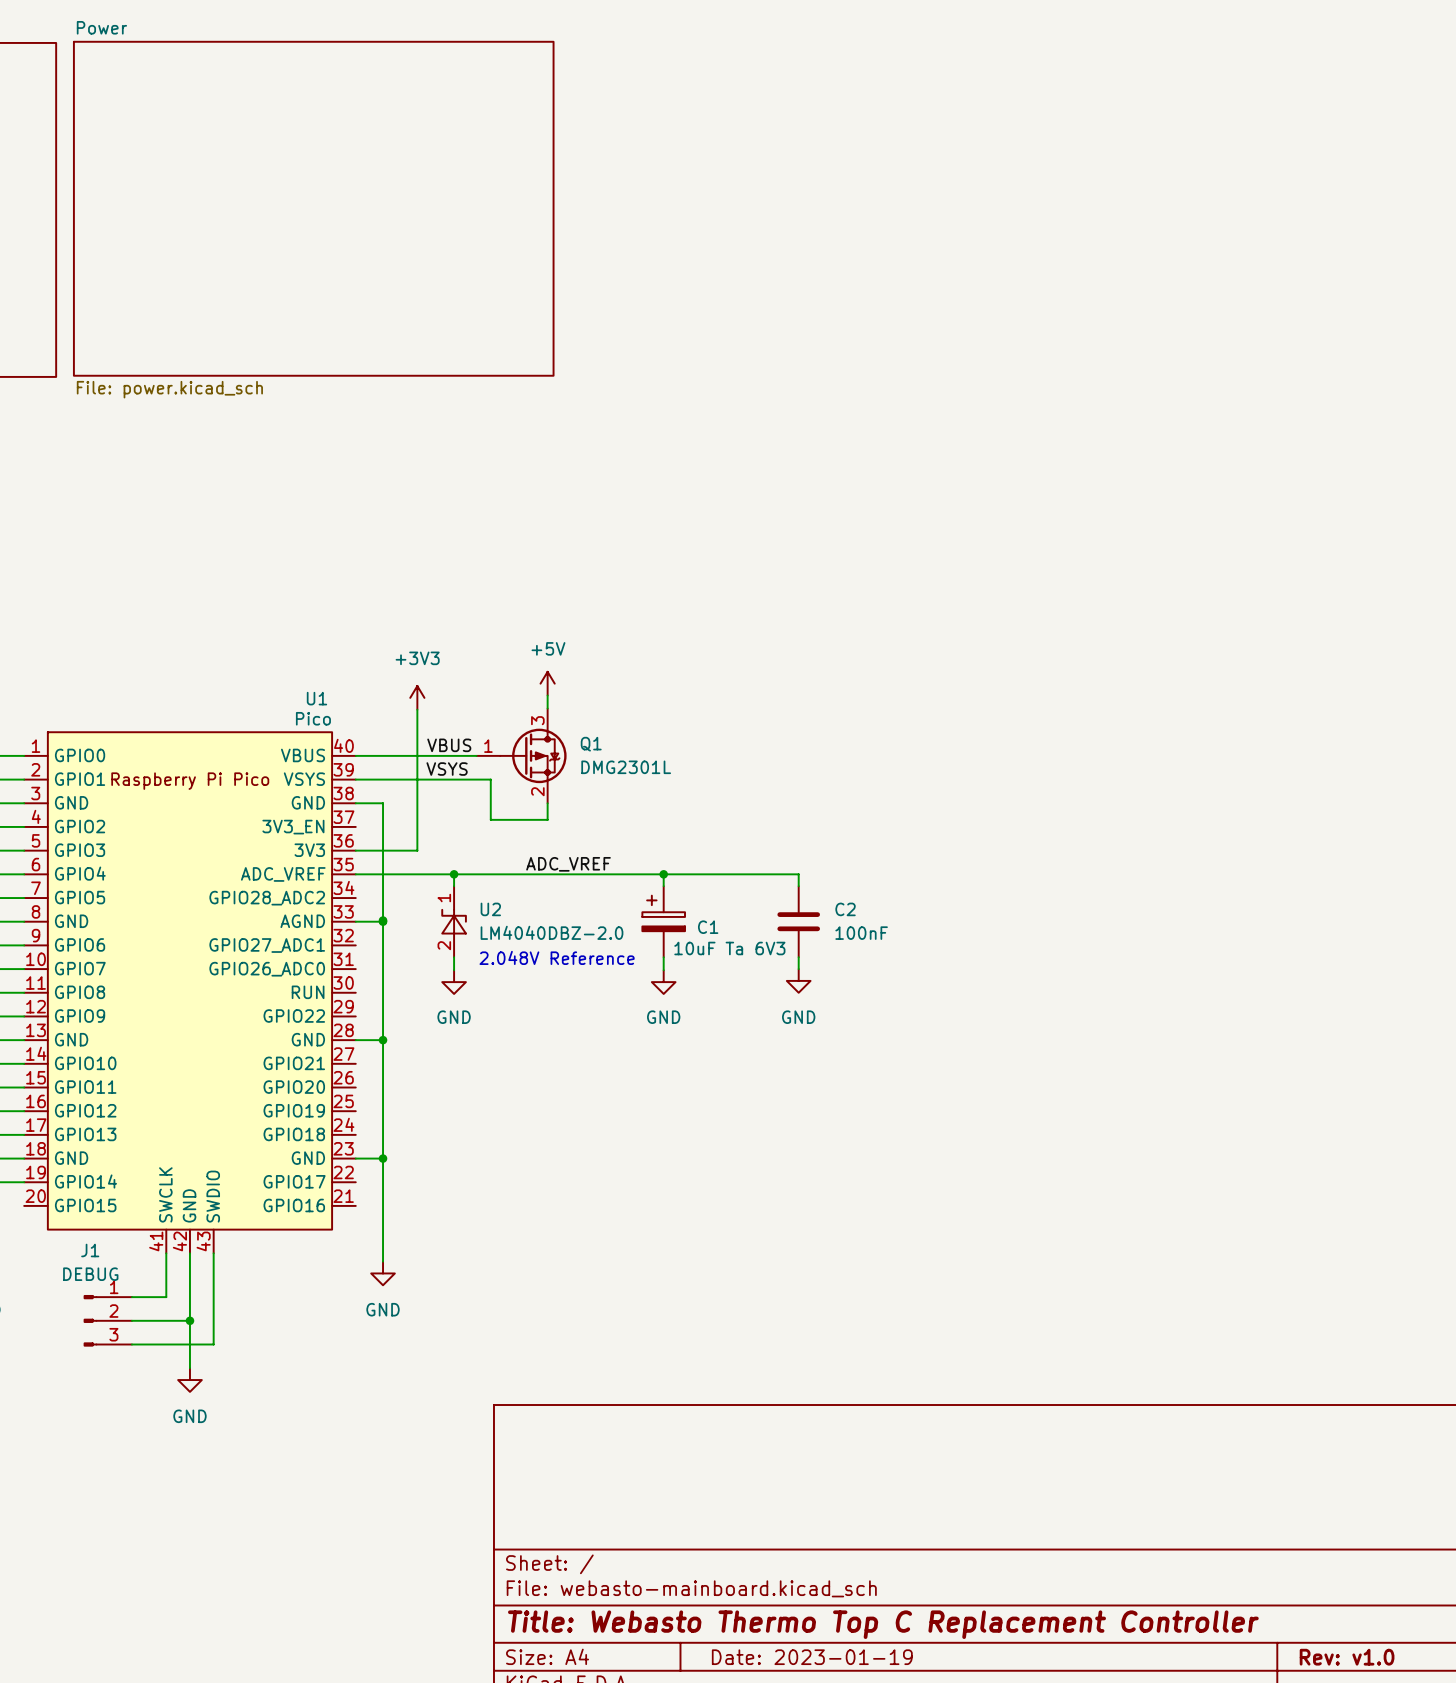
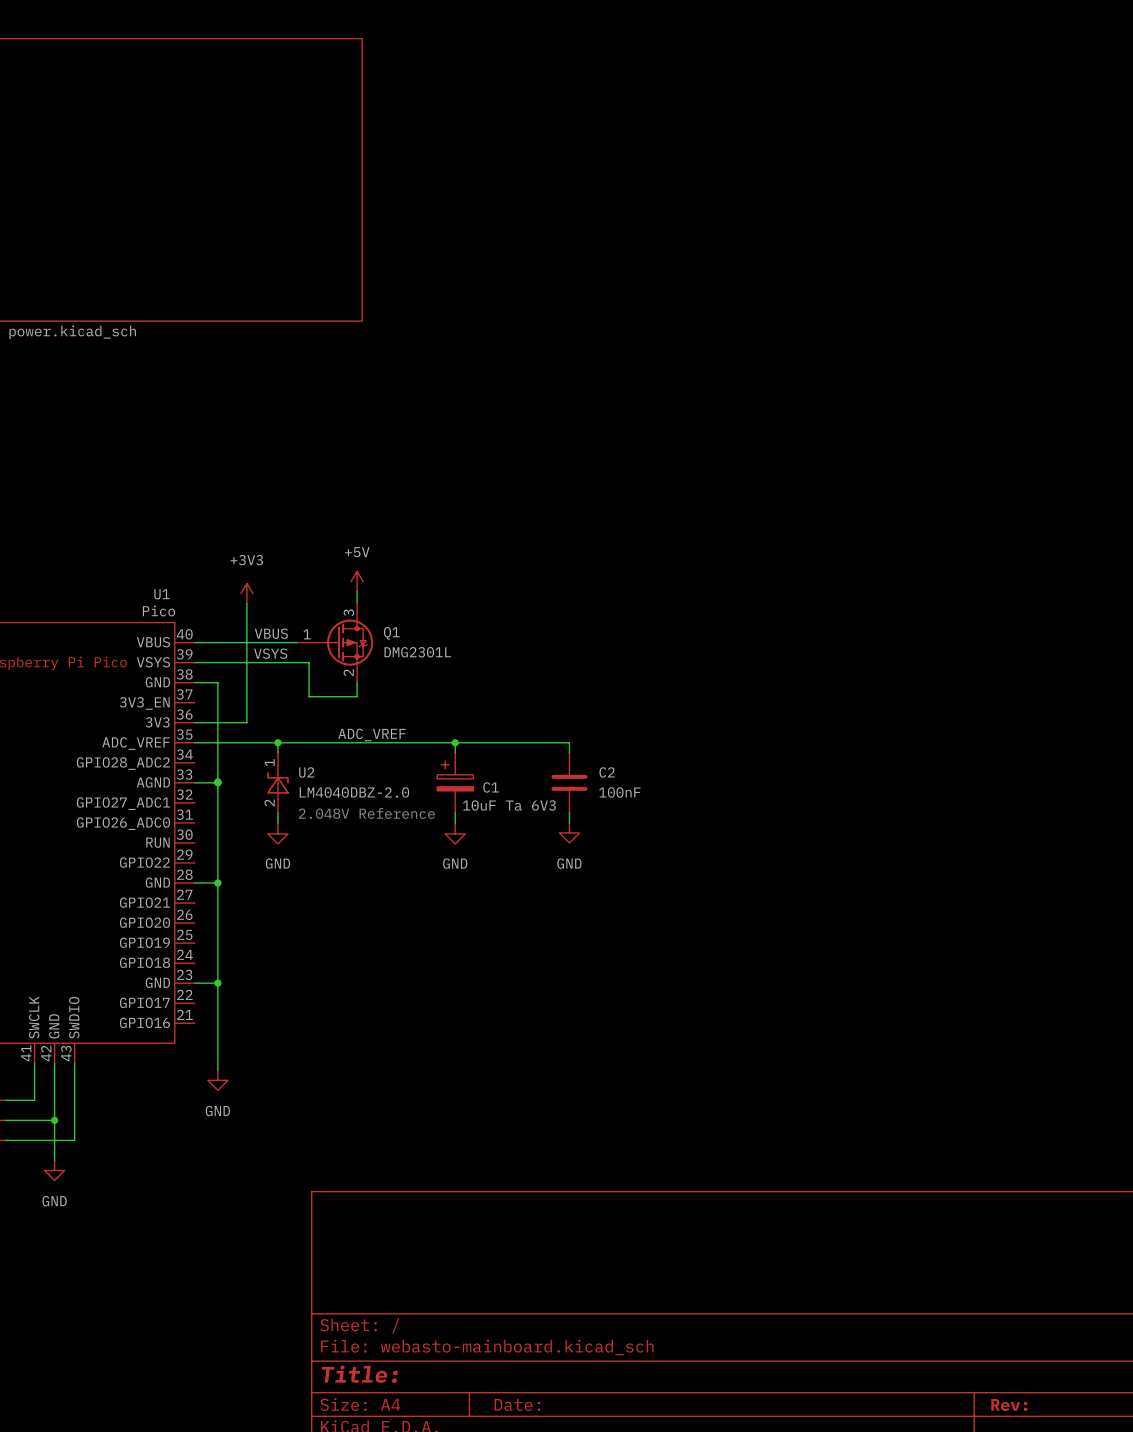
title block: Title: Webasto Thermo Top C Replacement Controller (883, 1624) -> Title: (359, 1374)
title block: Date: 2023-01-19 (812, 1657) -> Date: (517, 1404)
title block: Rev: v1.0 (1347, 1657) -> Rev: (1009, 1404)

